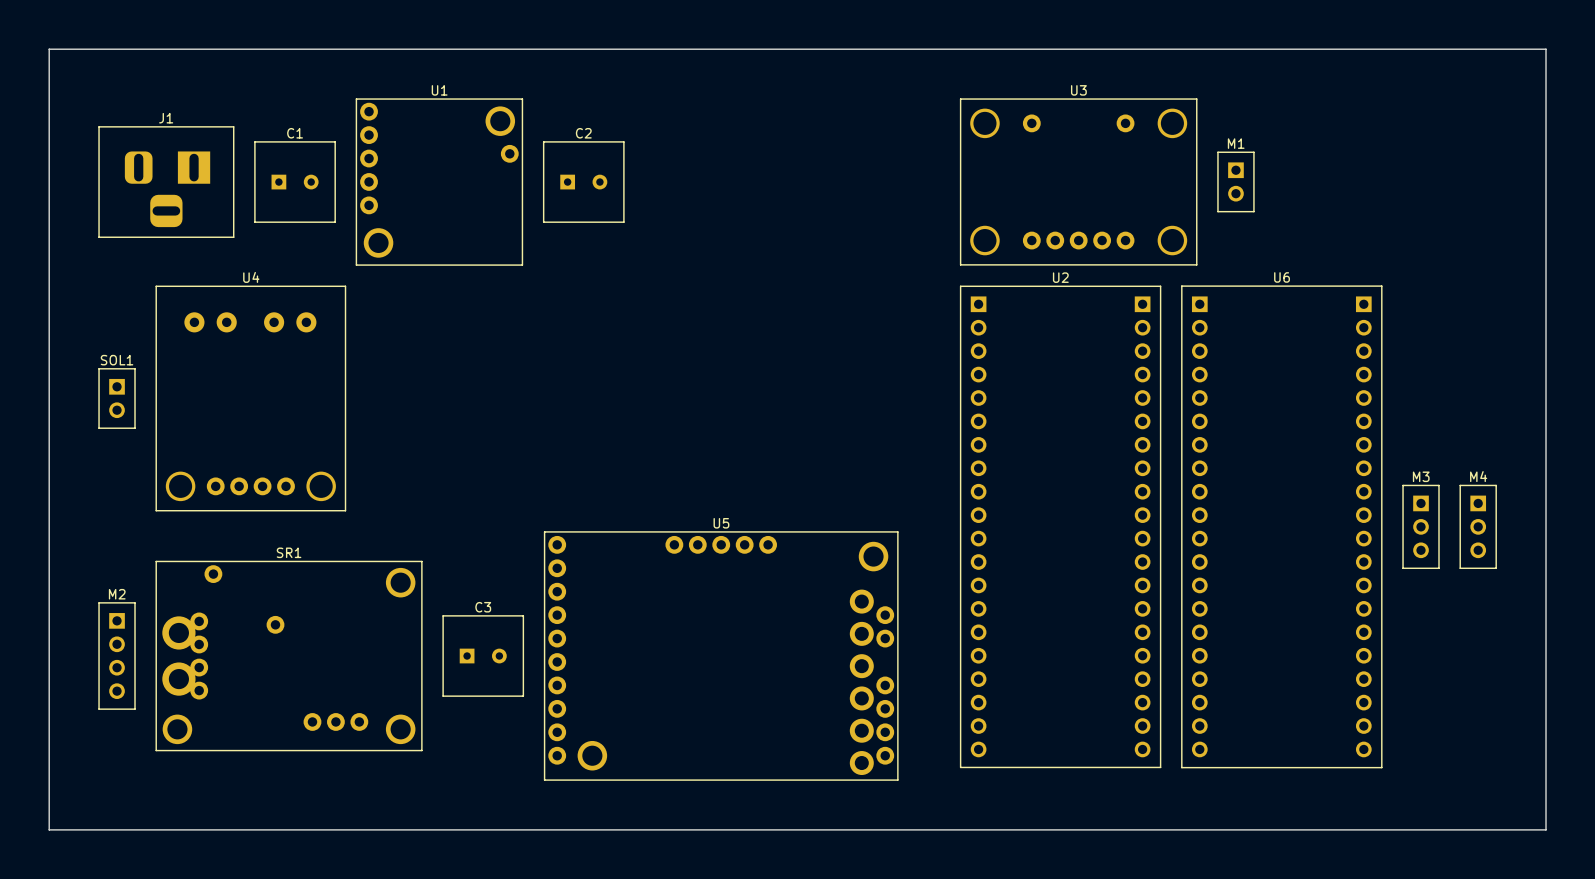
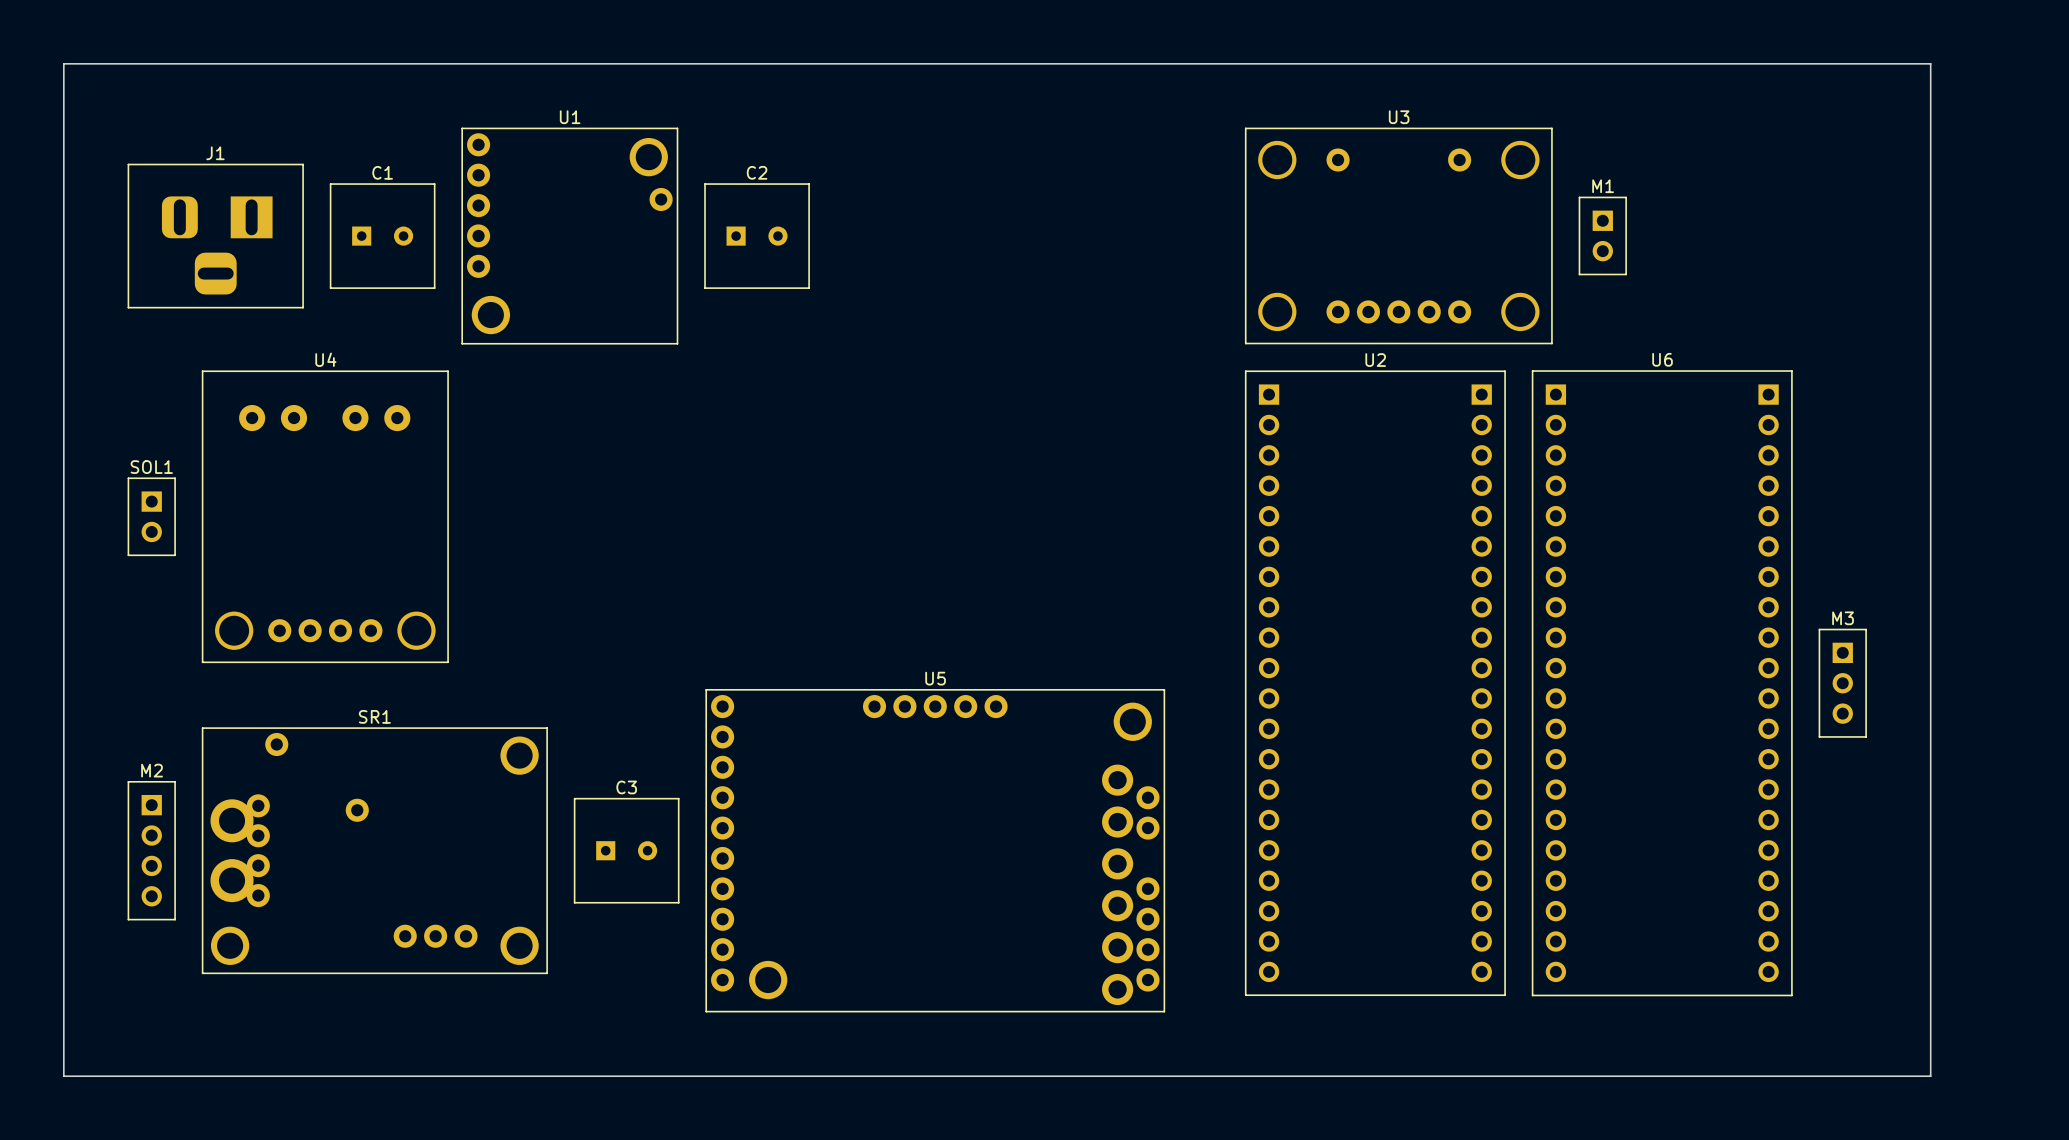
board edge: (1488, 49) (1546, 49) (1546, 829) (1488, 829) -> (1930, 63) (1930, 1076)
M4: (1478, 526) -> none

